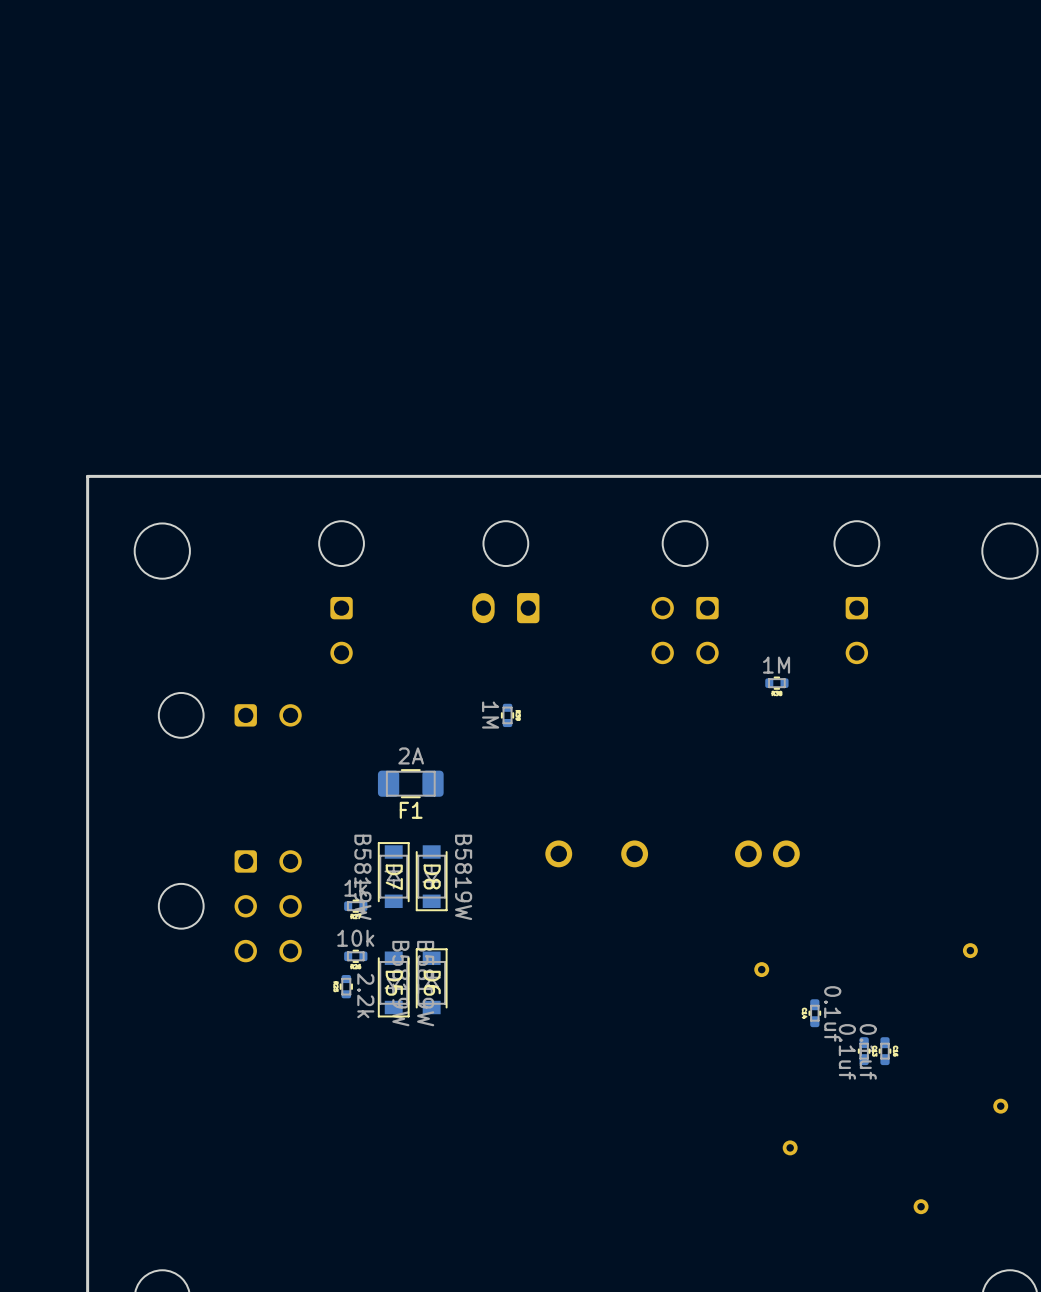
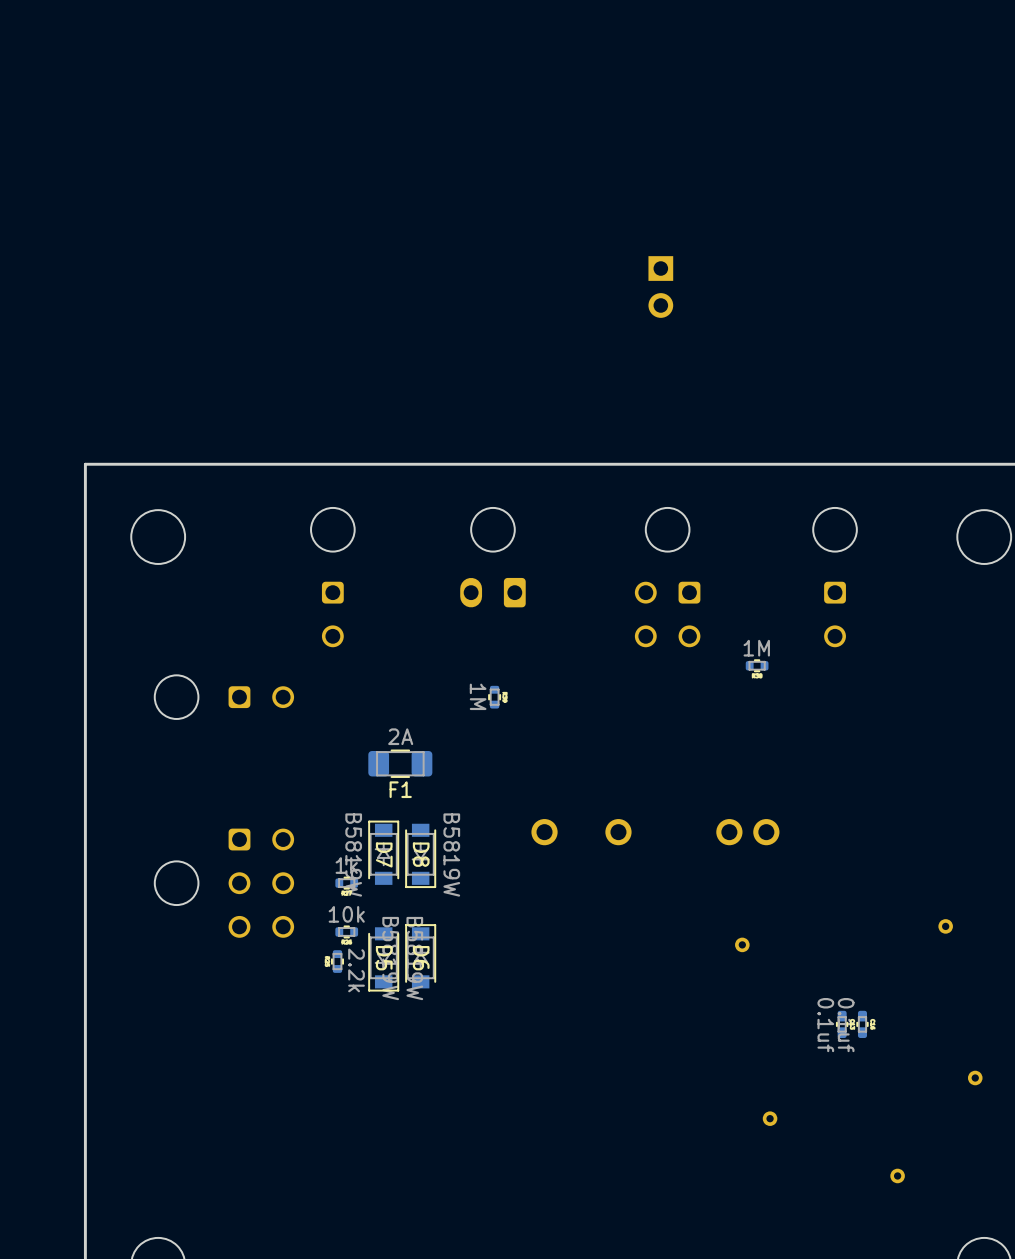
part: none -> (660, 287)
part: 0.1uf (814, 1013) -> none

